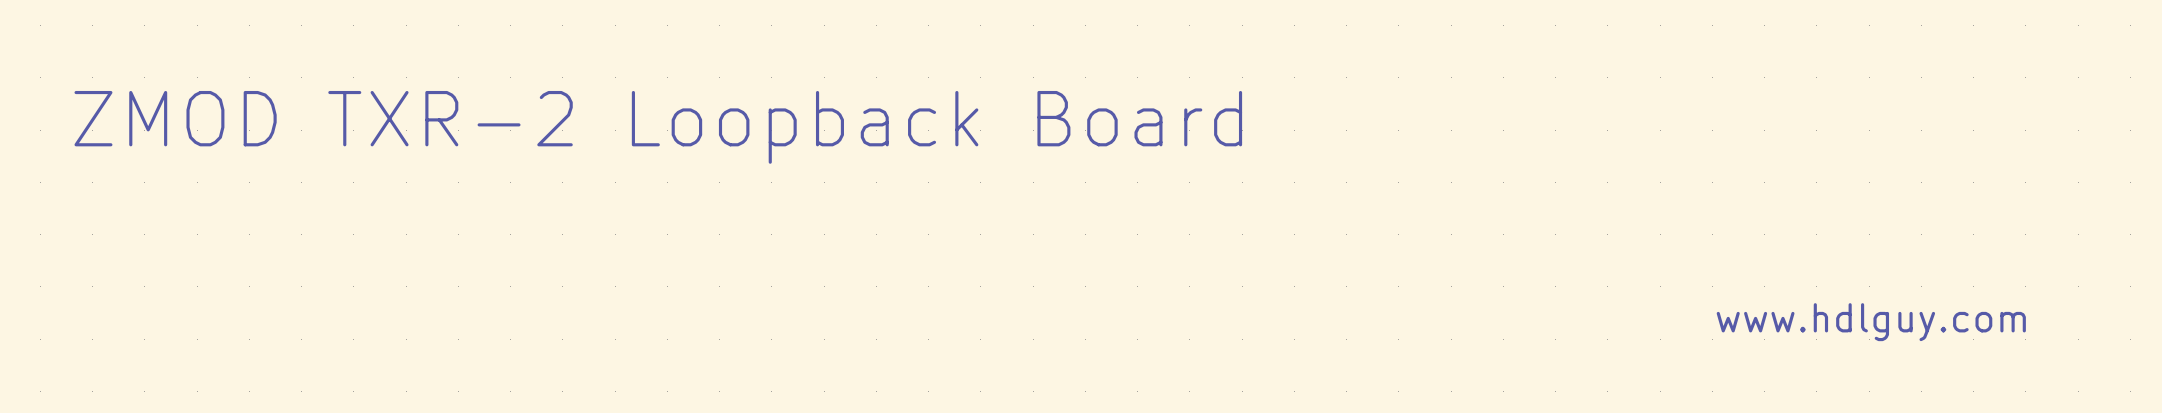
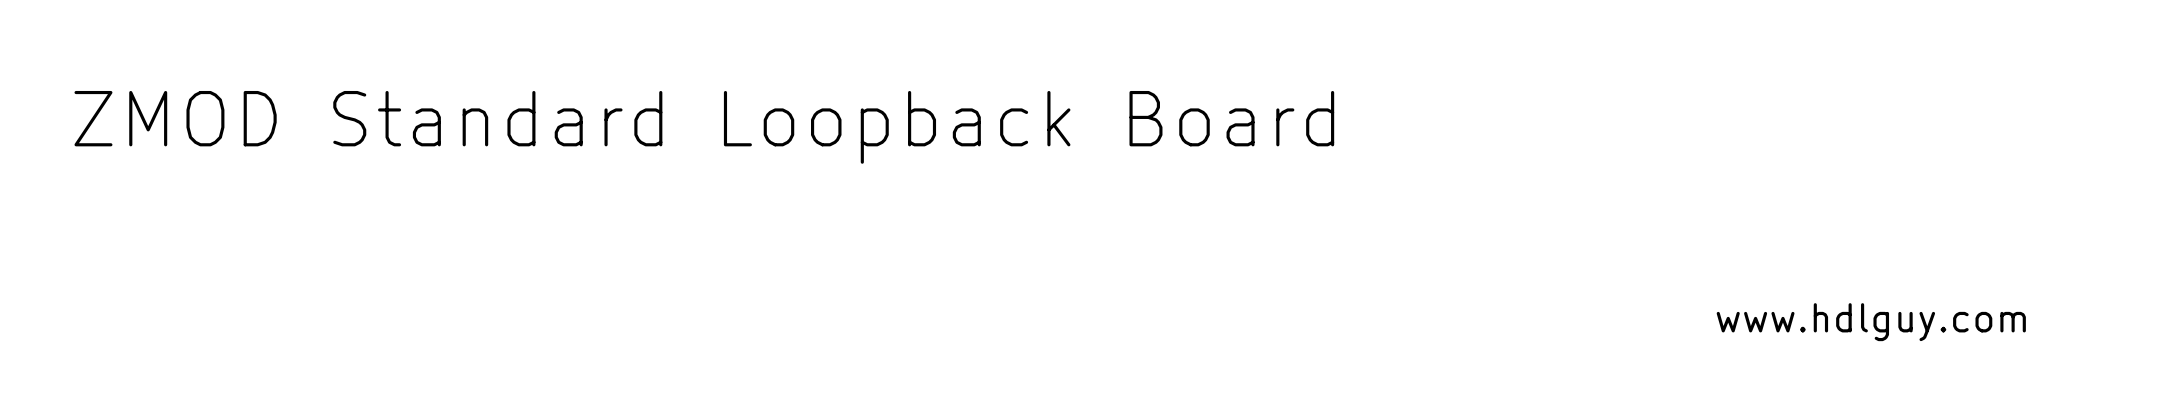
text: ZMOD TXR-2 Loopback Board (658, 127) -> ZMOD Standard Loopback Board (704, 127)

